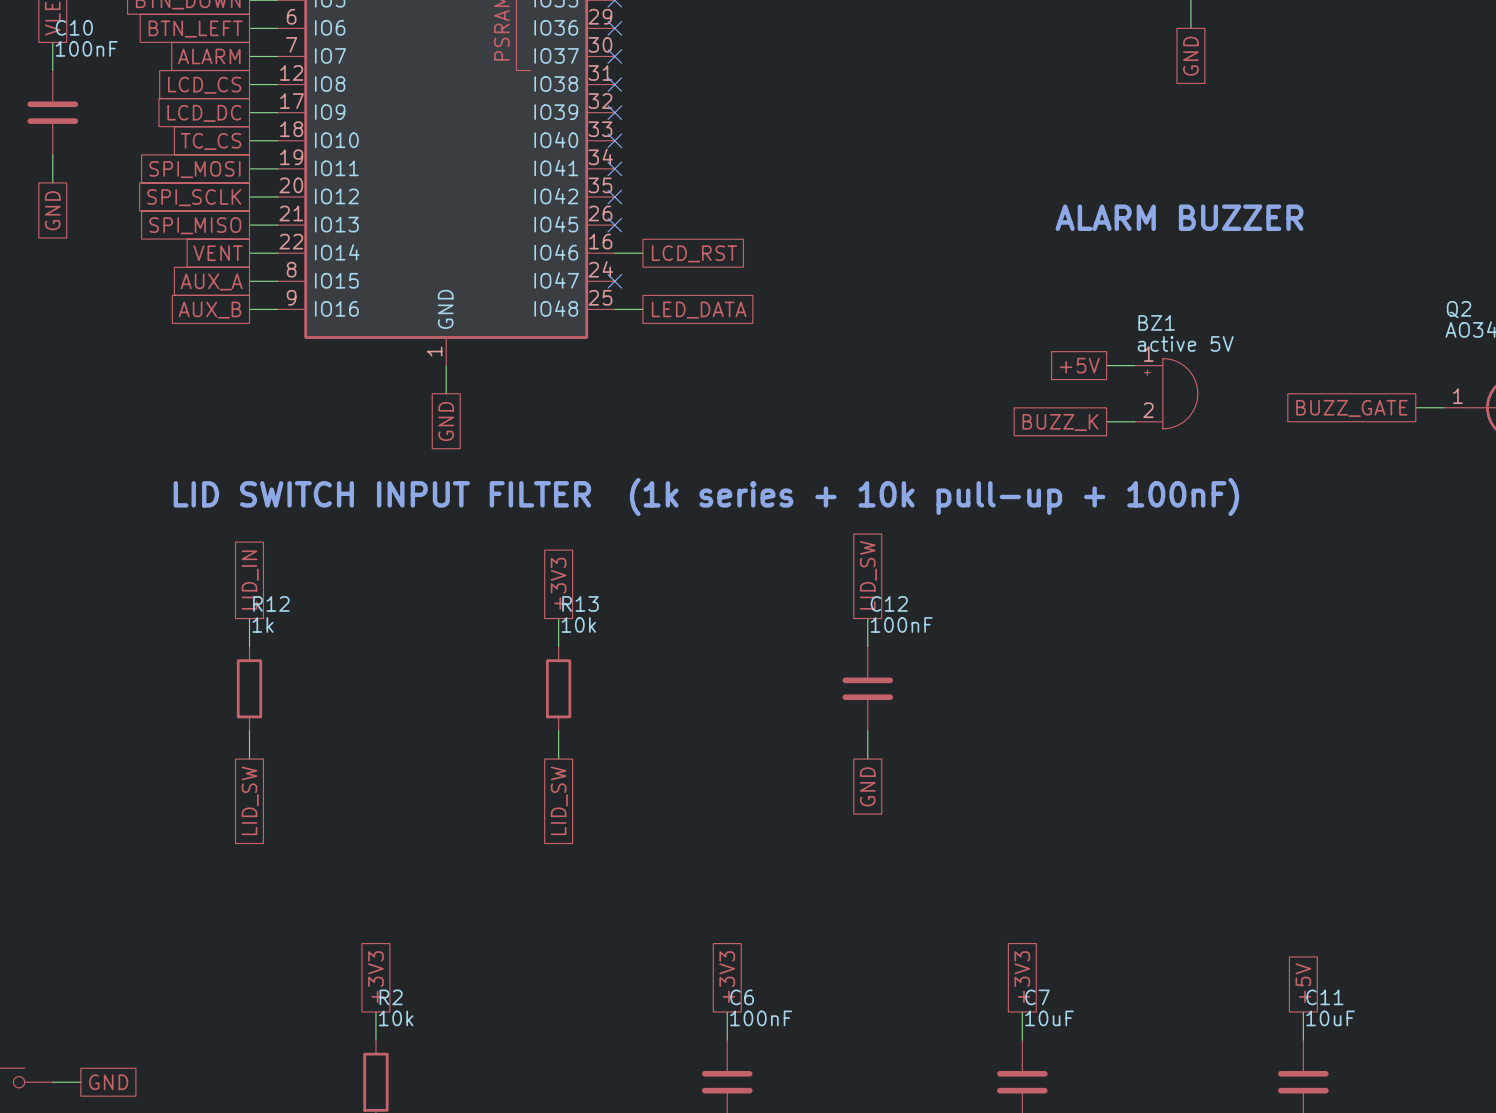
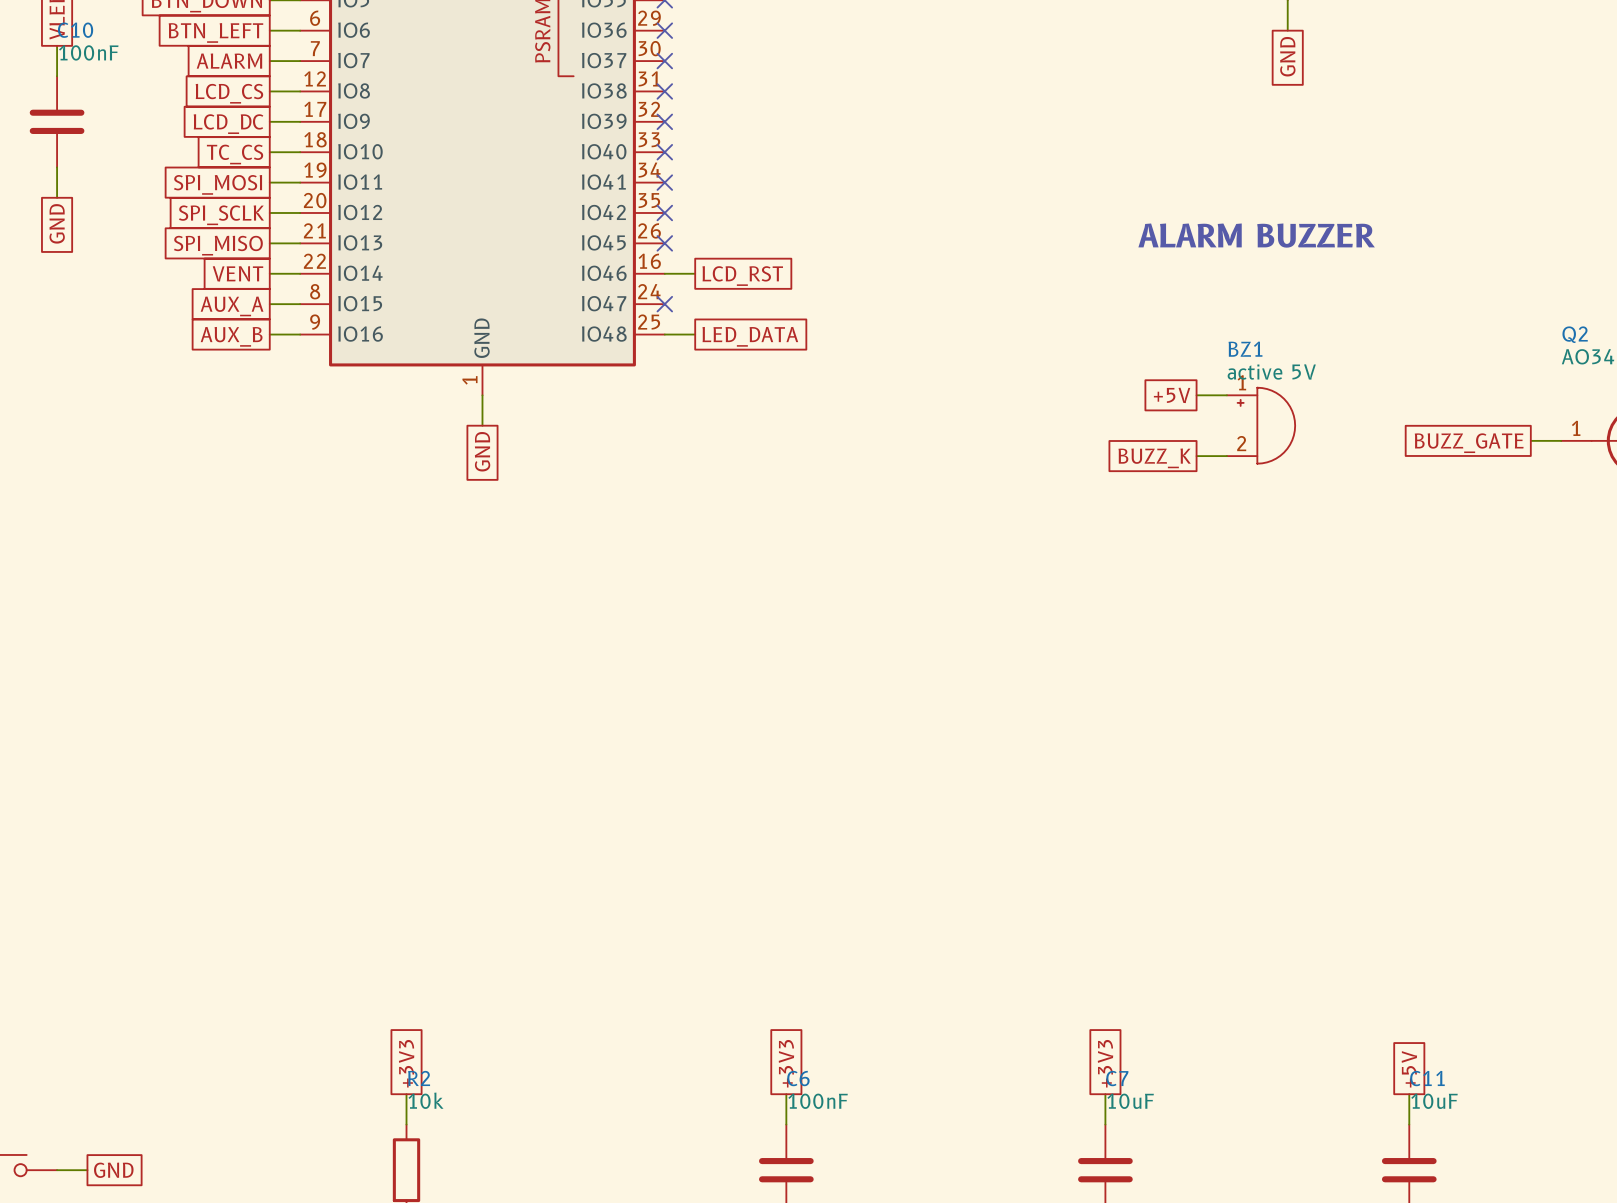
text: LID SWITCH INPUT FILTER (1k series + 10k pull-up + 100nF) (706, 496) -> none
global label: LID_SW (868, 575) -> none
global label: LID_IN (250, 580) -> none
global label: +3V3 (558, 583) -> none
wire: (249, 618) (249, 646) -> none
wire: (558, 618) (558, 646) -> none
wire: (867, 618) (867, 646) -> none
R12: 1k (249, 688) -> none
R13: 10k (558, 688) -> none
C12: 100nF (867, 688) -> none
wire: (249, 730) (249, 759) -> none
wire: (558, 730) (558, 759) -> none
wire: (867, 730) (867, 759) -> none
global label: GND (867, 786) -> none
global label: LID_SW (250, 800) -> none
global label: LID_SW (559, 800) -> none

